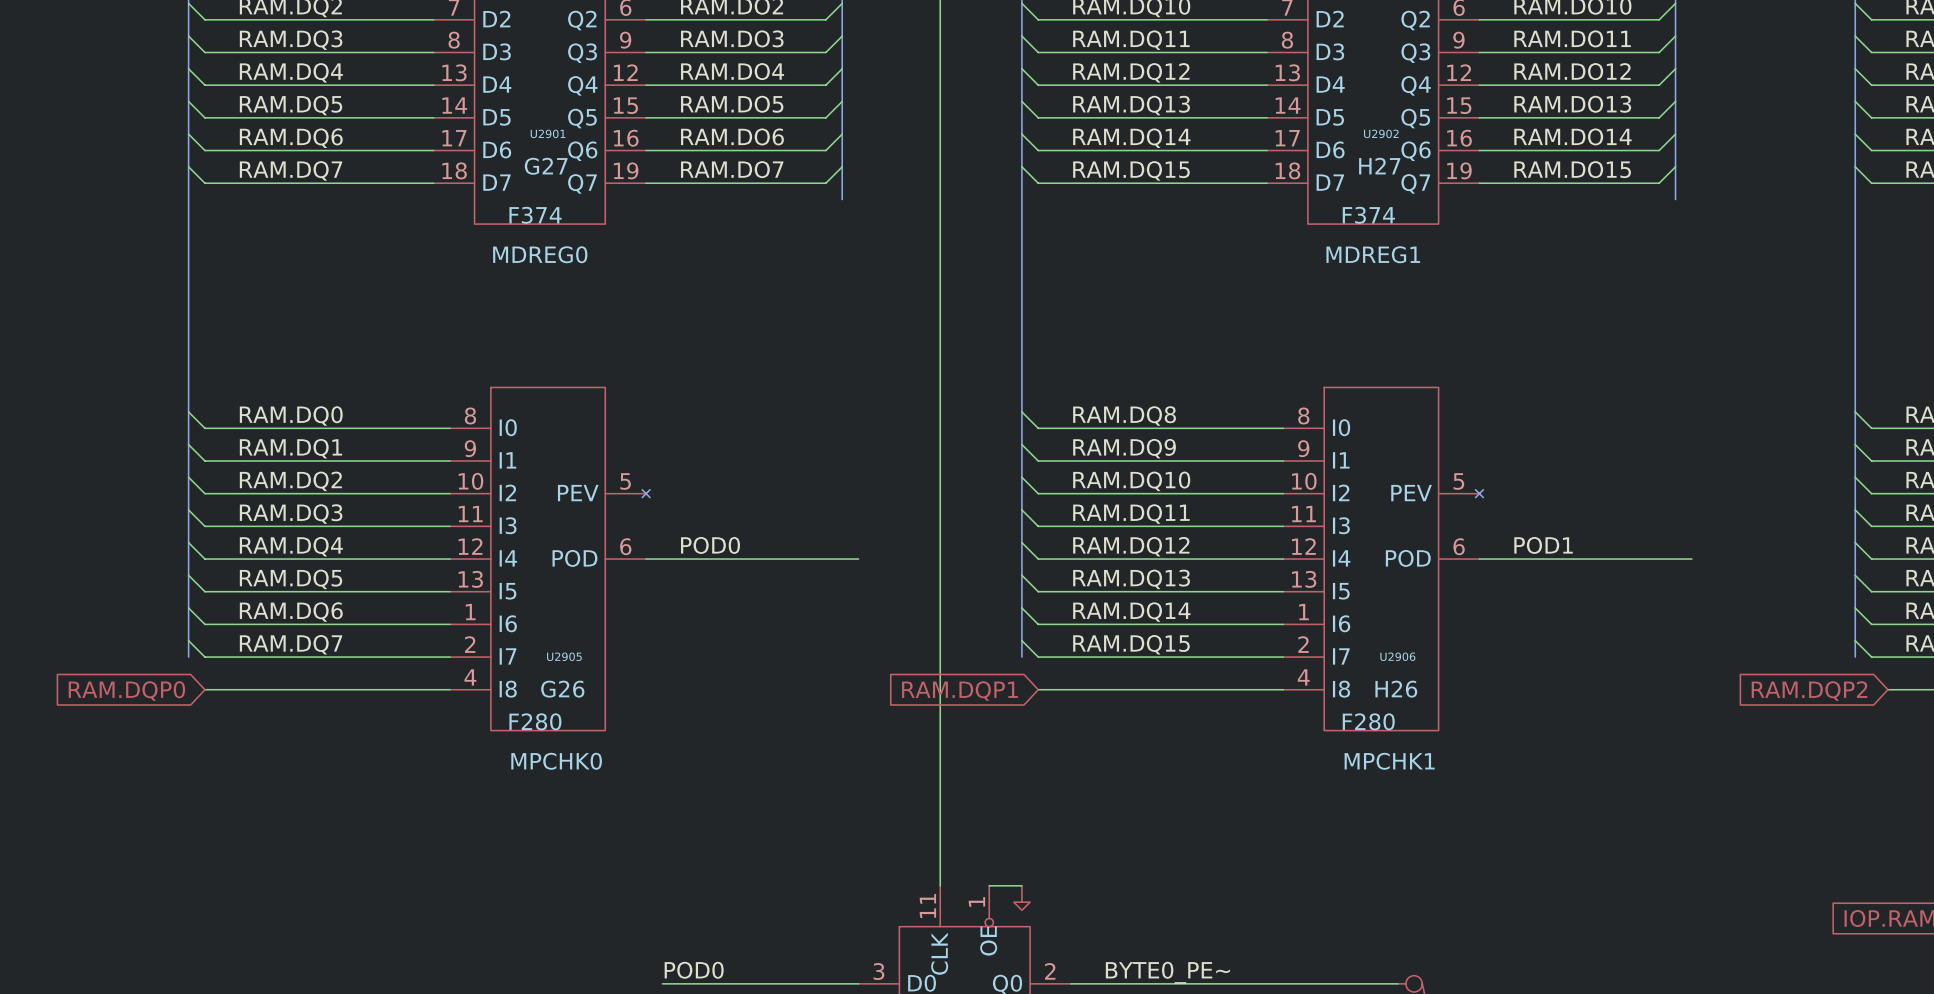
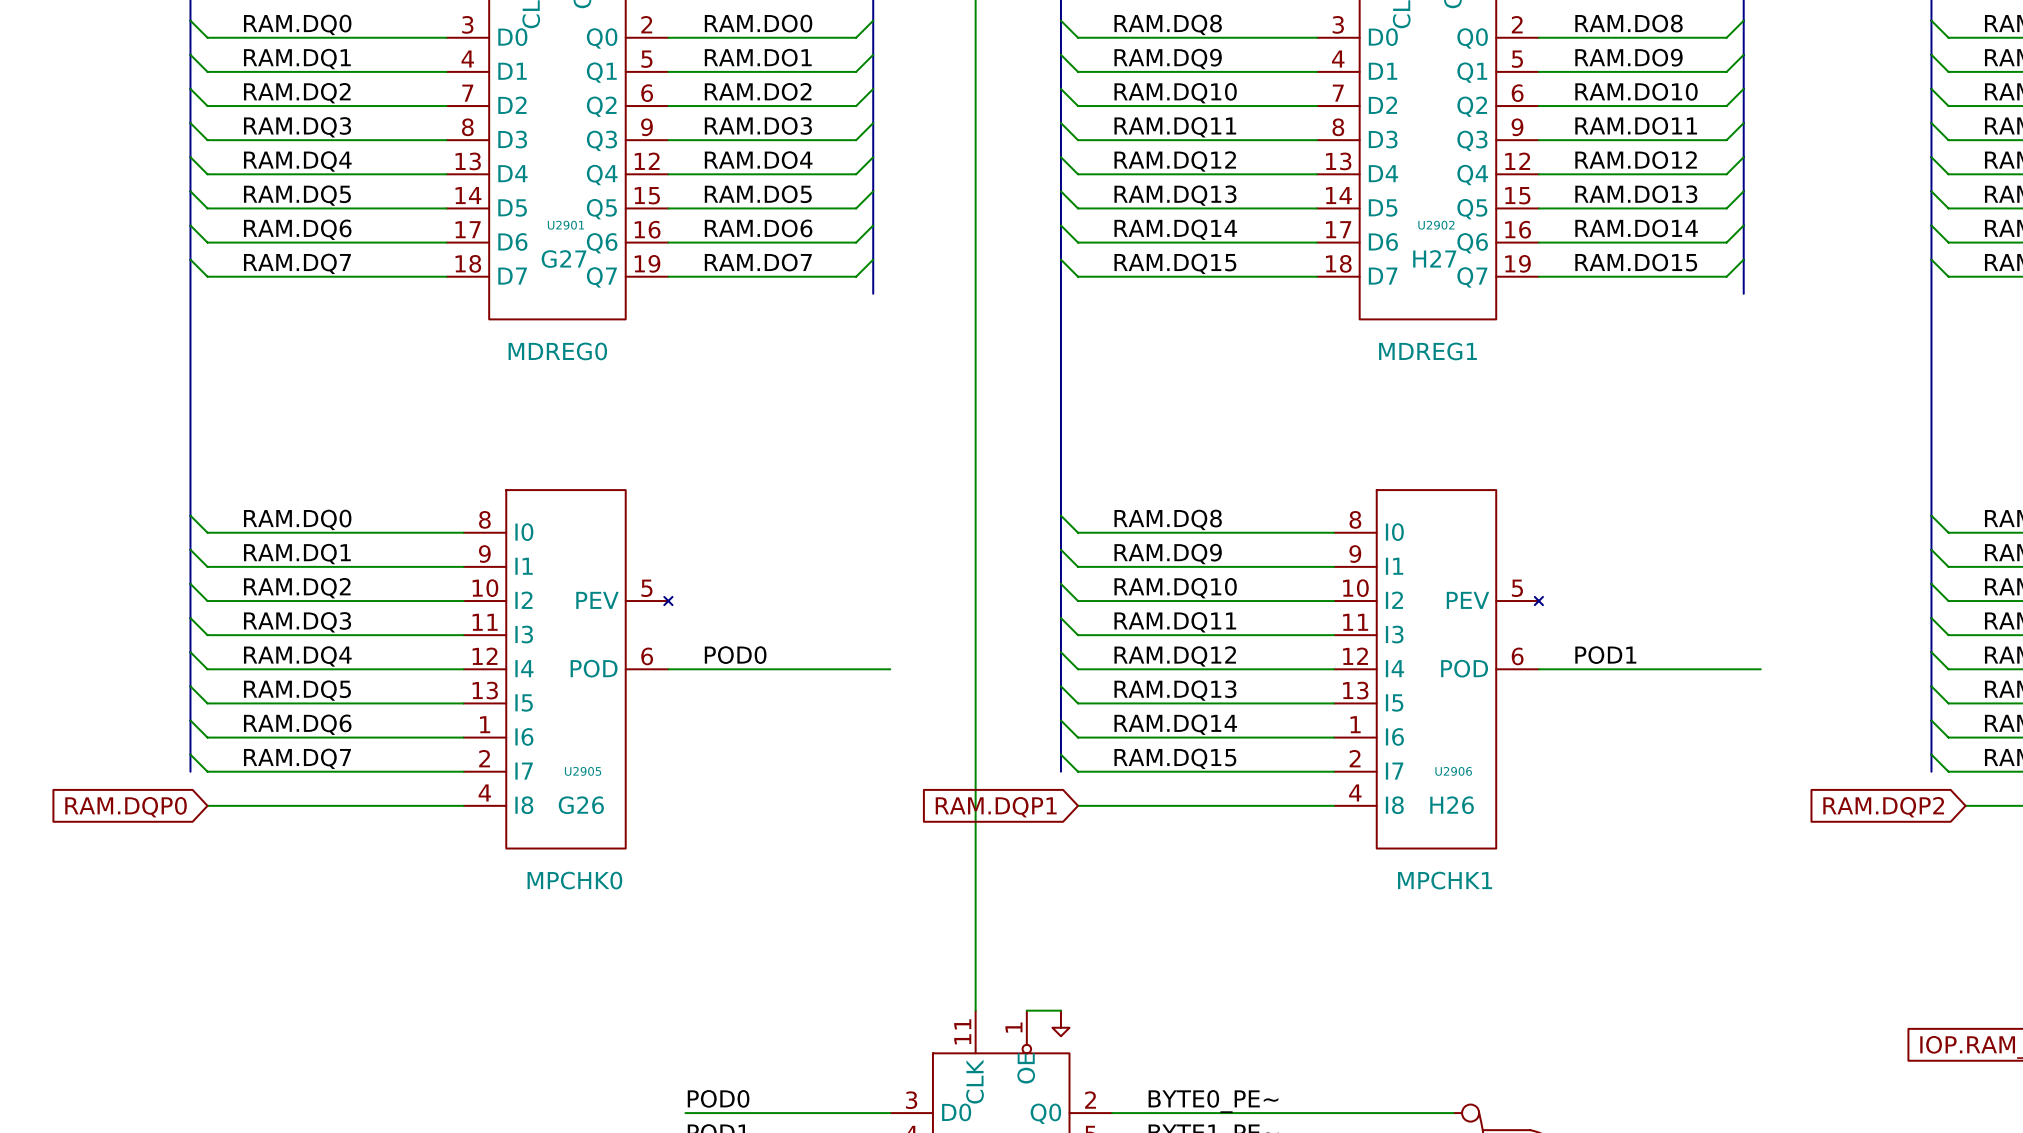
U2901 value: F374 (535, 215) -> none
U2902 value: F374 (1368, 215) -> none
U2905 value: F280 (535, 721) -> none
U2906 value: F280 (1368, 721) -> none

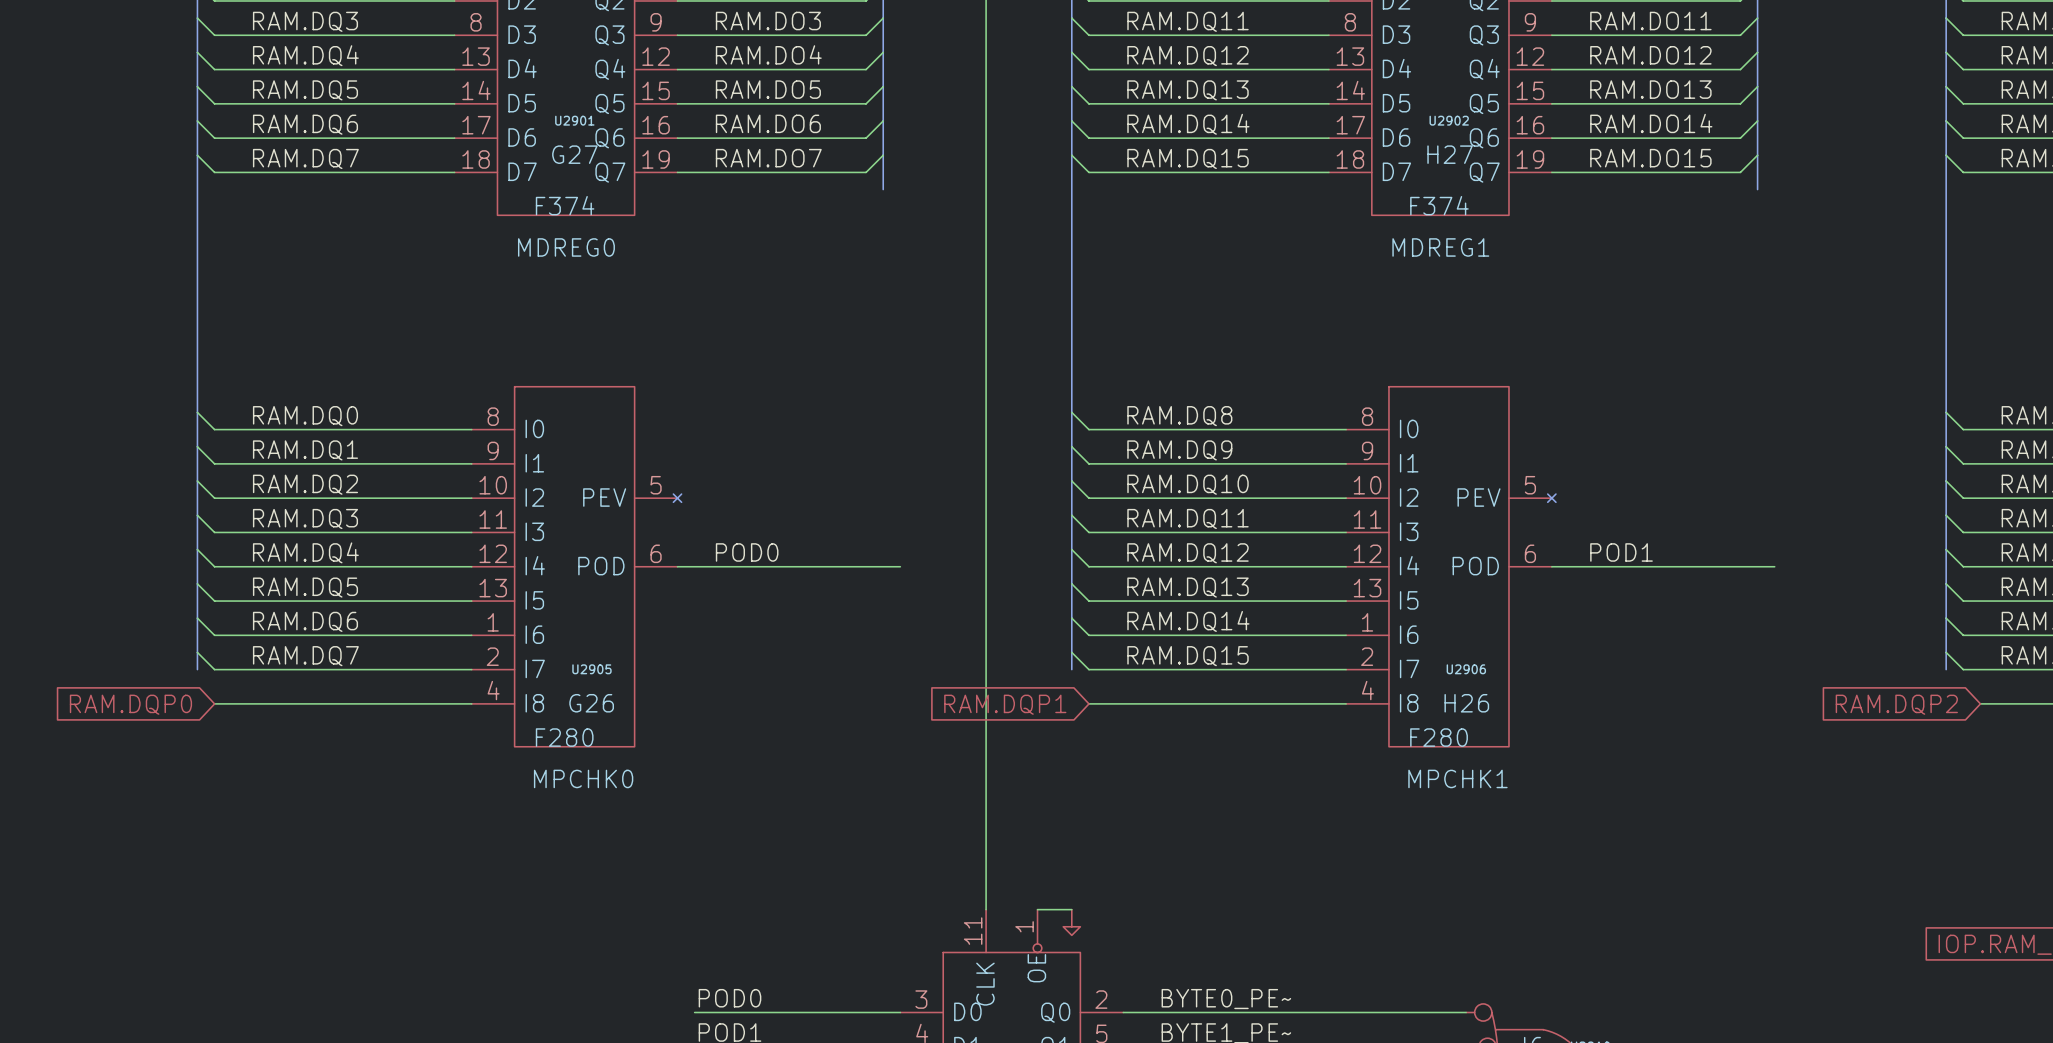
U2901 value: none -> F374 (565, 205)
U2902 value: none -> F374 (1439, 205)
U2905 value: none -> F280 (564, 737)
U2906 value: none -> F280 (1439, 737)

